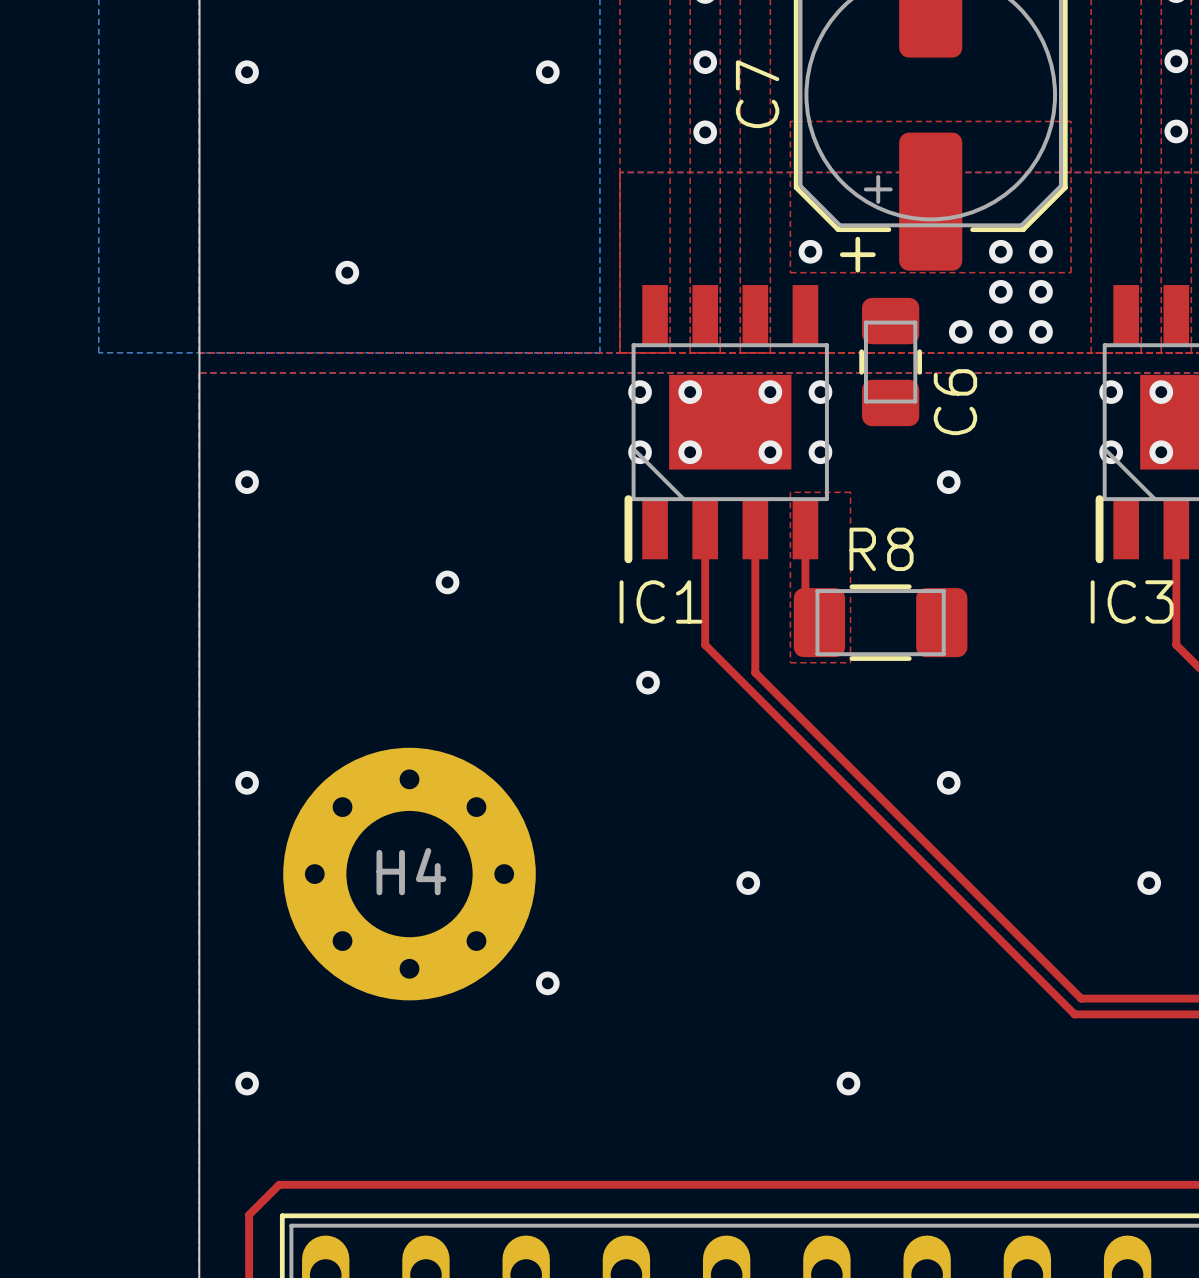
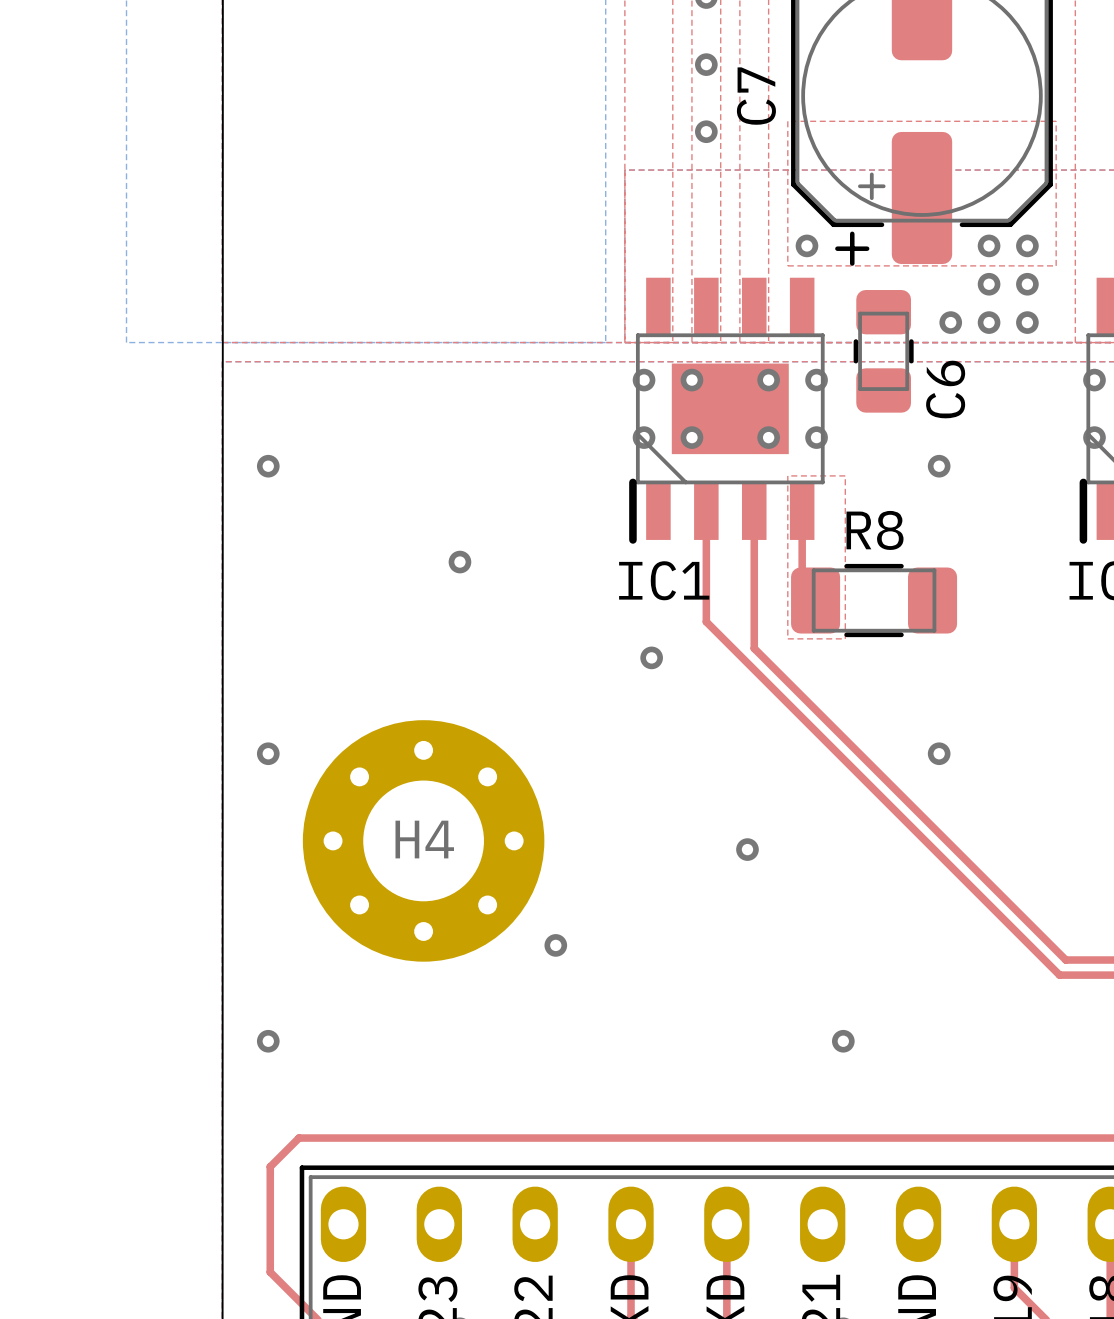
via: (247, 72) -> none
via: (547, 72) -> none
via: (347, 272) -> none

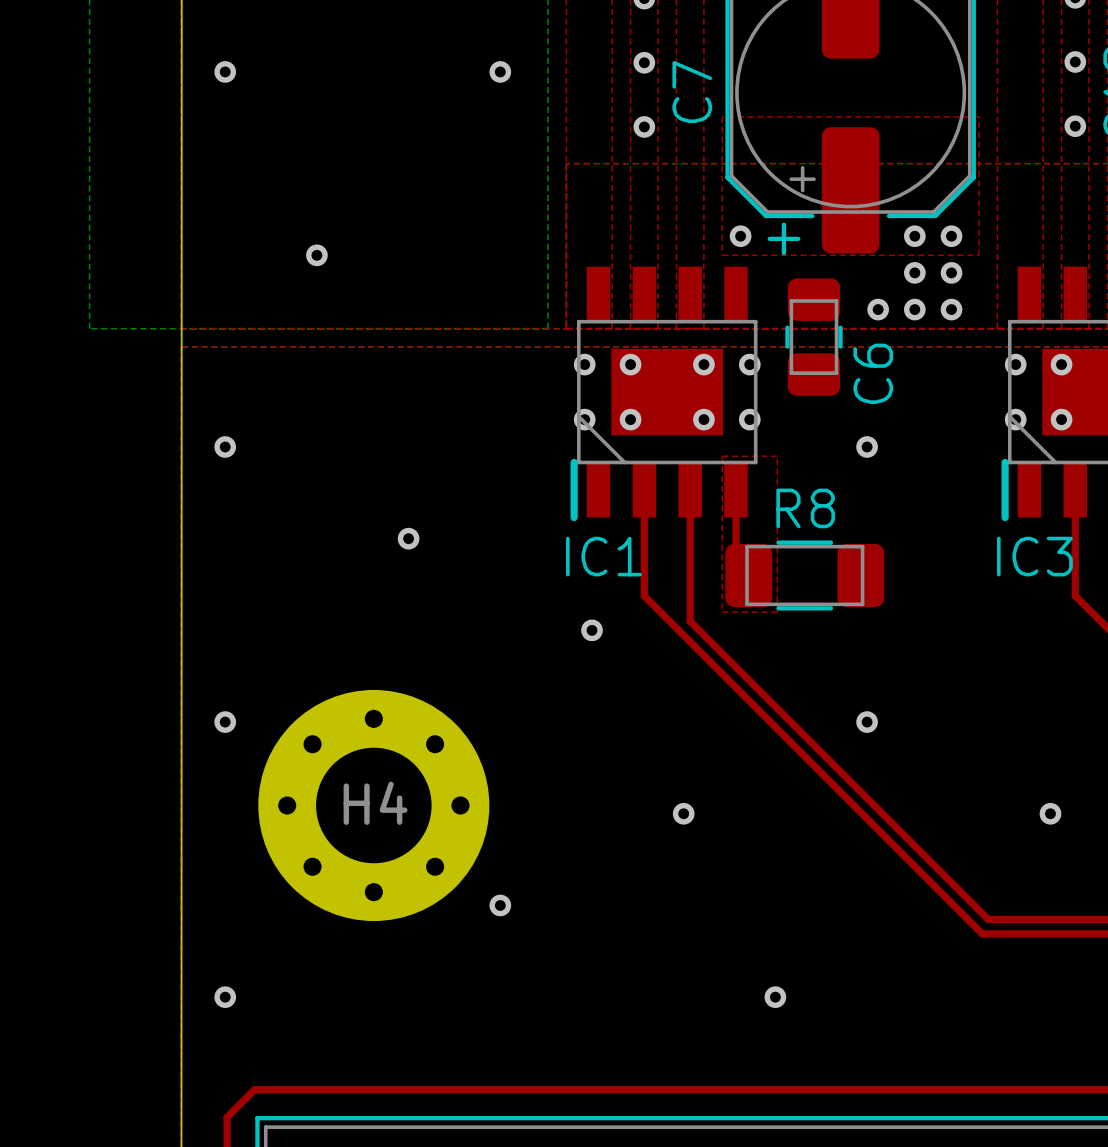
via: none -> (225, 71)
via: none -> (500, 71)
via: none -> (316, 255)

